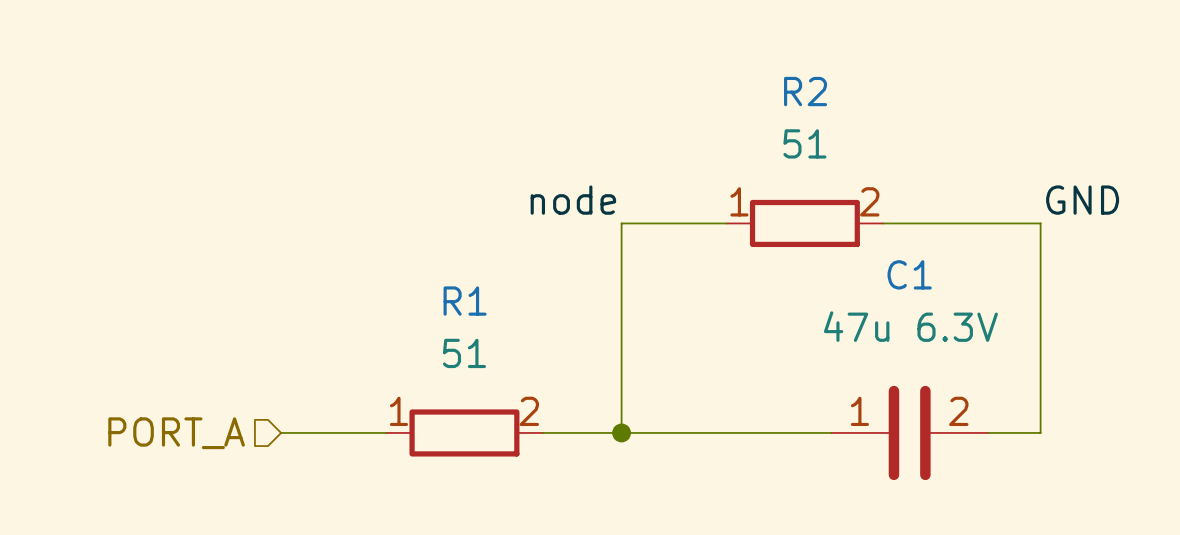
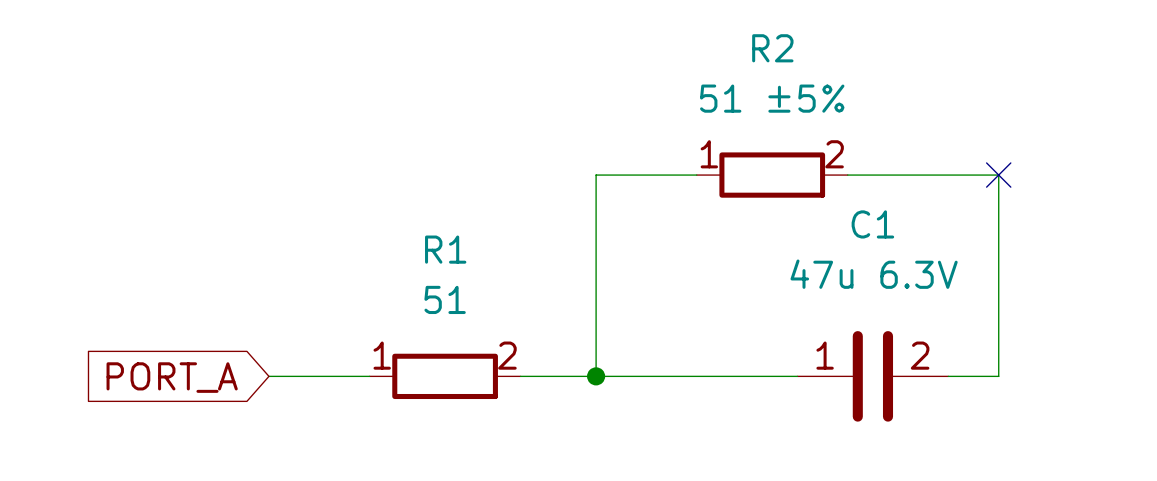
R2 value: 51 (804, 143) -> 51 ±5% (772, 98)
label: node (573, 200) -> none
label: GND (1082, 200) -> none
no-connect mark: none -> (998, 175)
hierarchical label: PORT_A (176, 433) -> none
global label: none -> PORT_A (172, 377)

